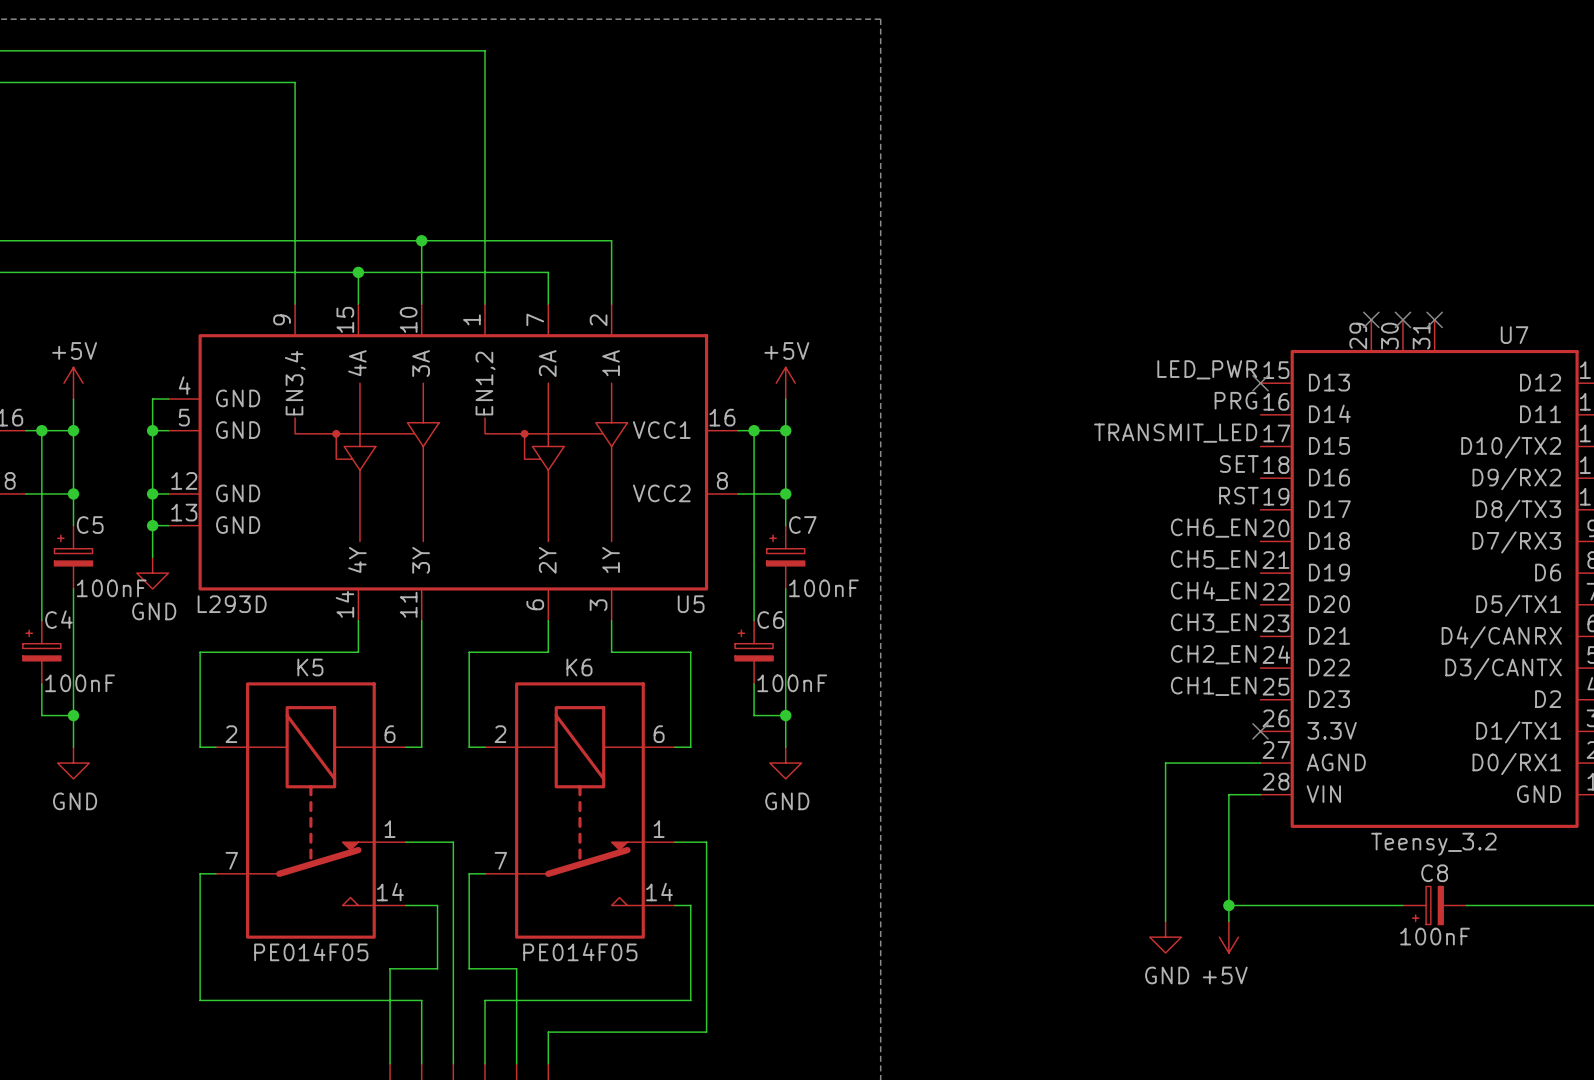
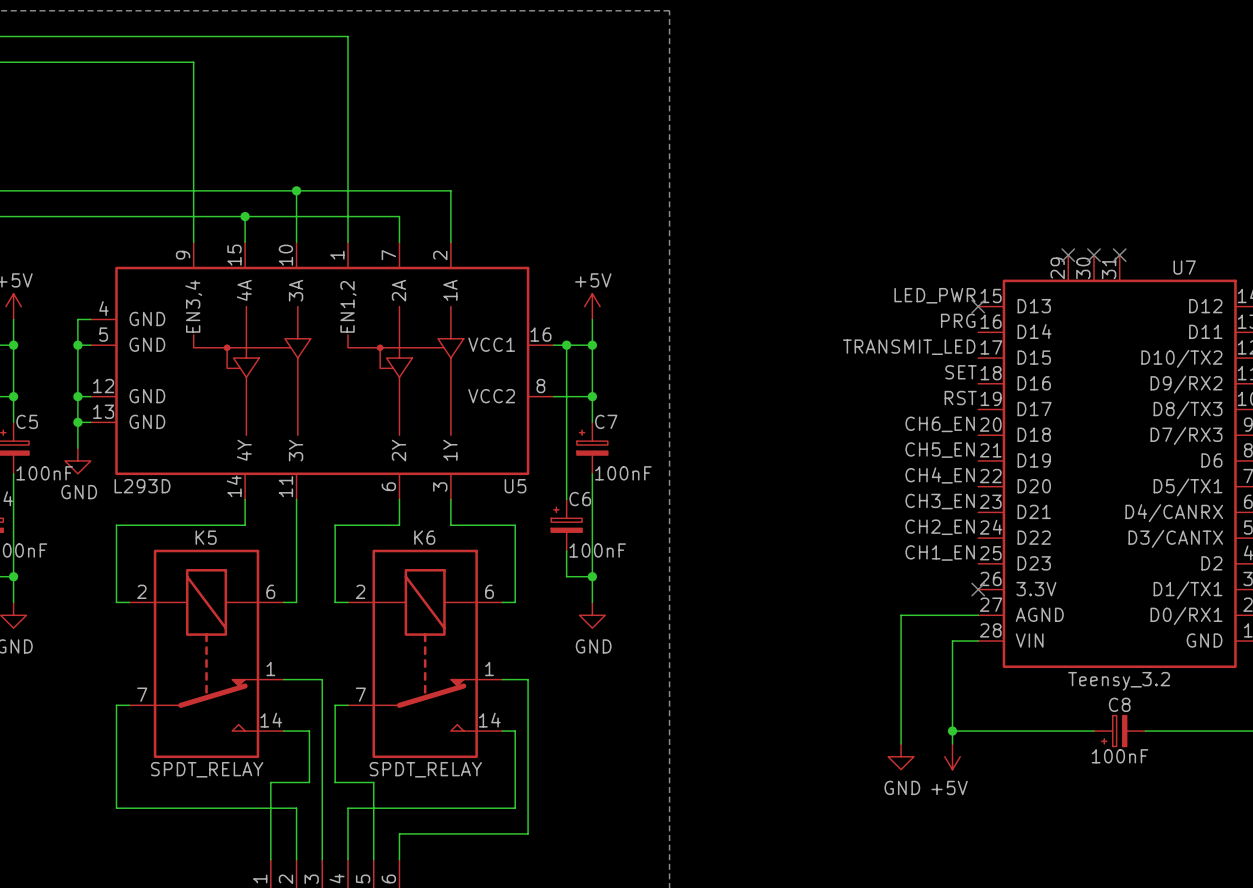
K5 value: PE014F05 (311, 952) -> SPDT_RELAY (207, 769)
K6 value: PE014F05 (580, 952) -> SPDT_RELAY (425, 769)

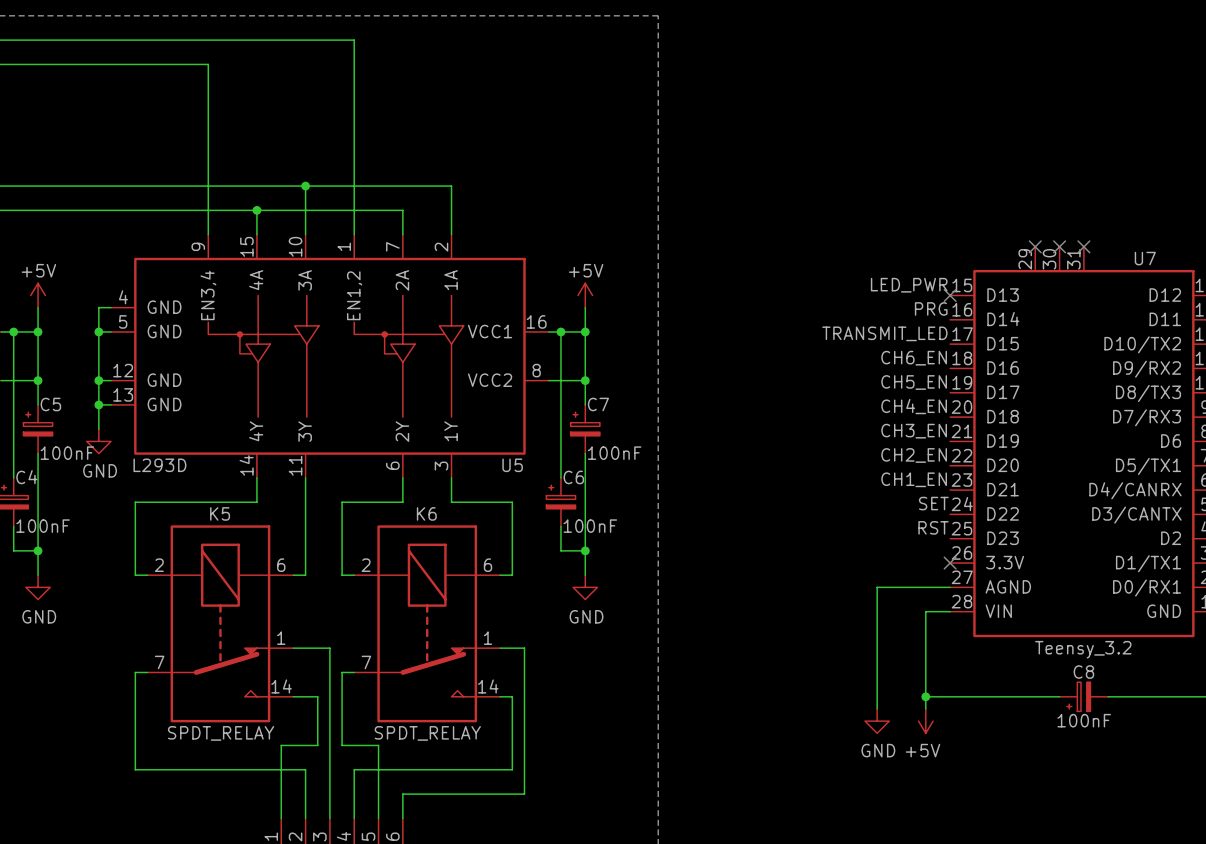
label: SET (960, 372) -> CH6_EN (914, 358)
label: RST (960, 398) -> CH5_EN (914, 382)
label: CH6_EN (940, 424) -> CH4_EN (914, 406)
label: CH5_EN (940, 450) -> CH3_EN (914, 431)
label: CH4_EN (940, 475) -> CH2_EN (914, 455)
label: CH3_EN (940, 501) -> CH1_EN (914, 479)
label: CH2_EN (940, 527) -> SET (933, 503)
label: CH1_EN (940, 552) -> RST (933, 527)

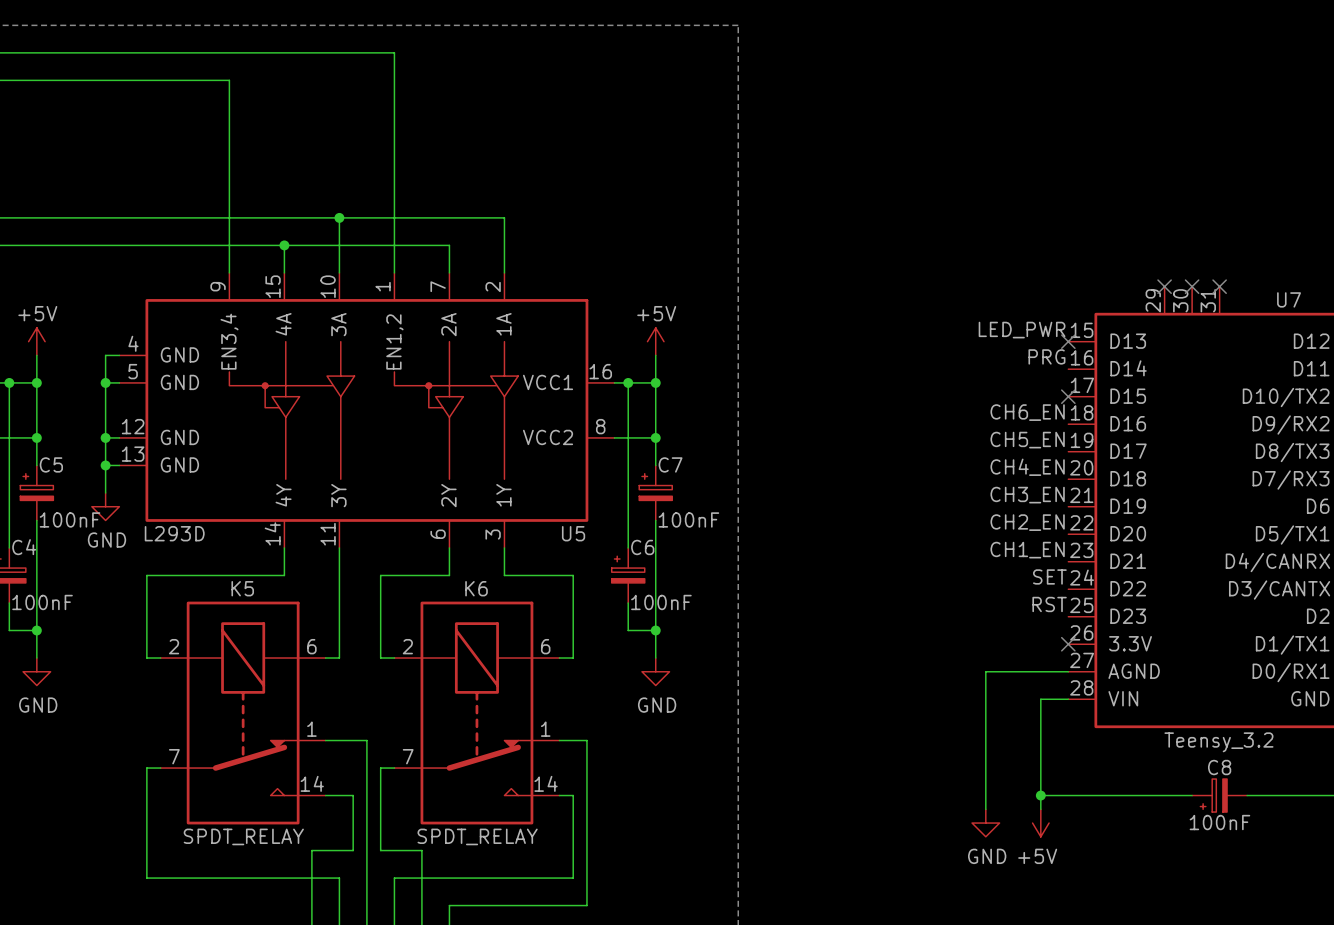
label: TRANSMIT_LED (884, 333) -> none
no-connect mark: none -> (1068, 396)

